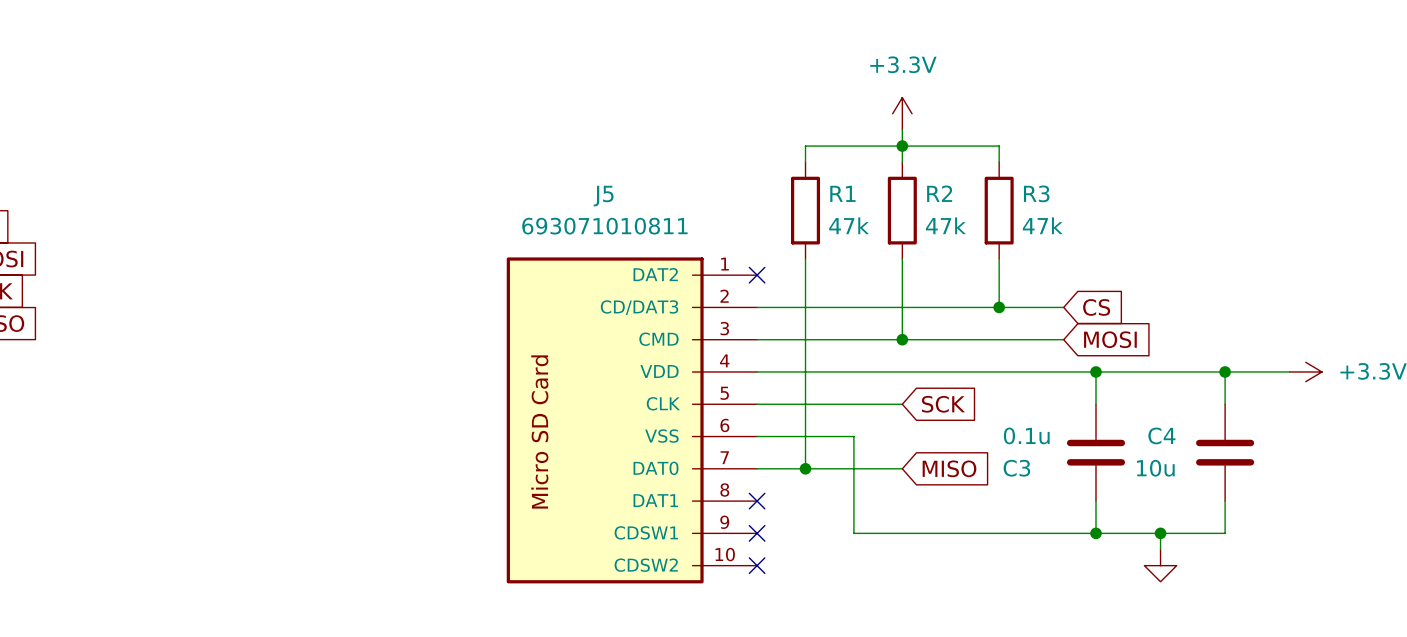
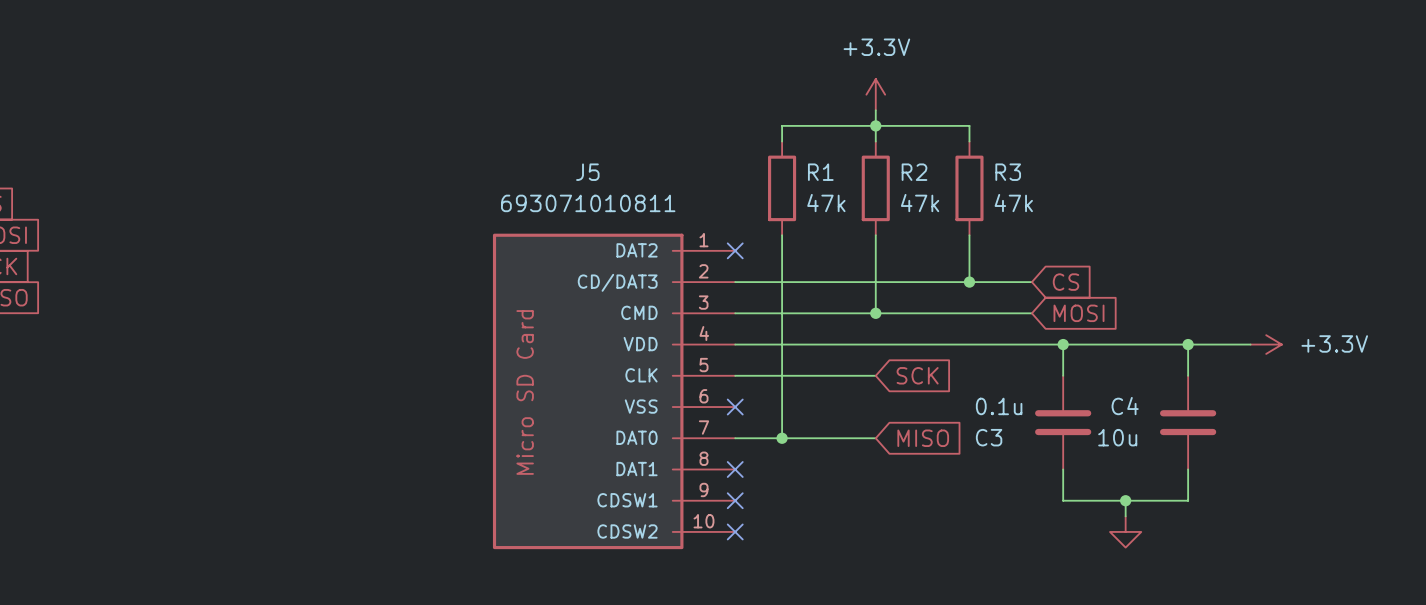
wire: (757, 436) (853, 436) (853, 533) (1095, 533) -> none
no-connect mark: none -> (735, 407)
junction: (1095, 533) -> none

